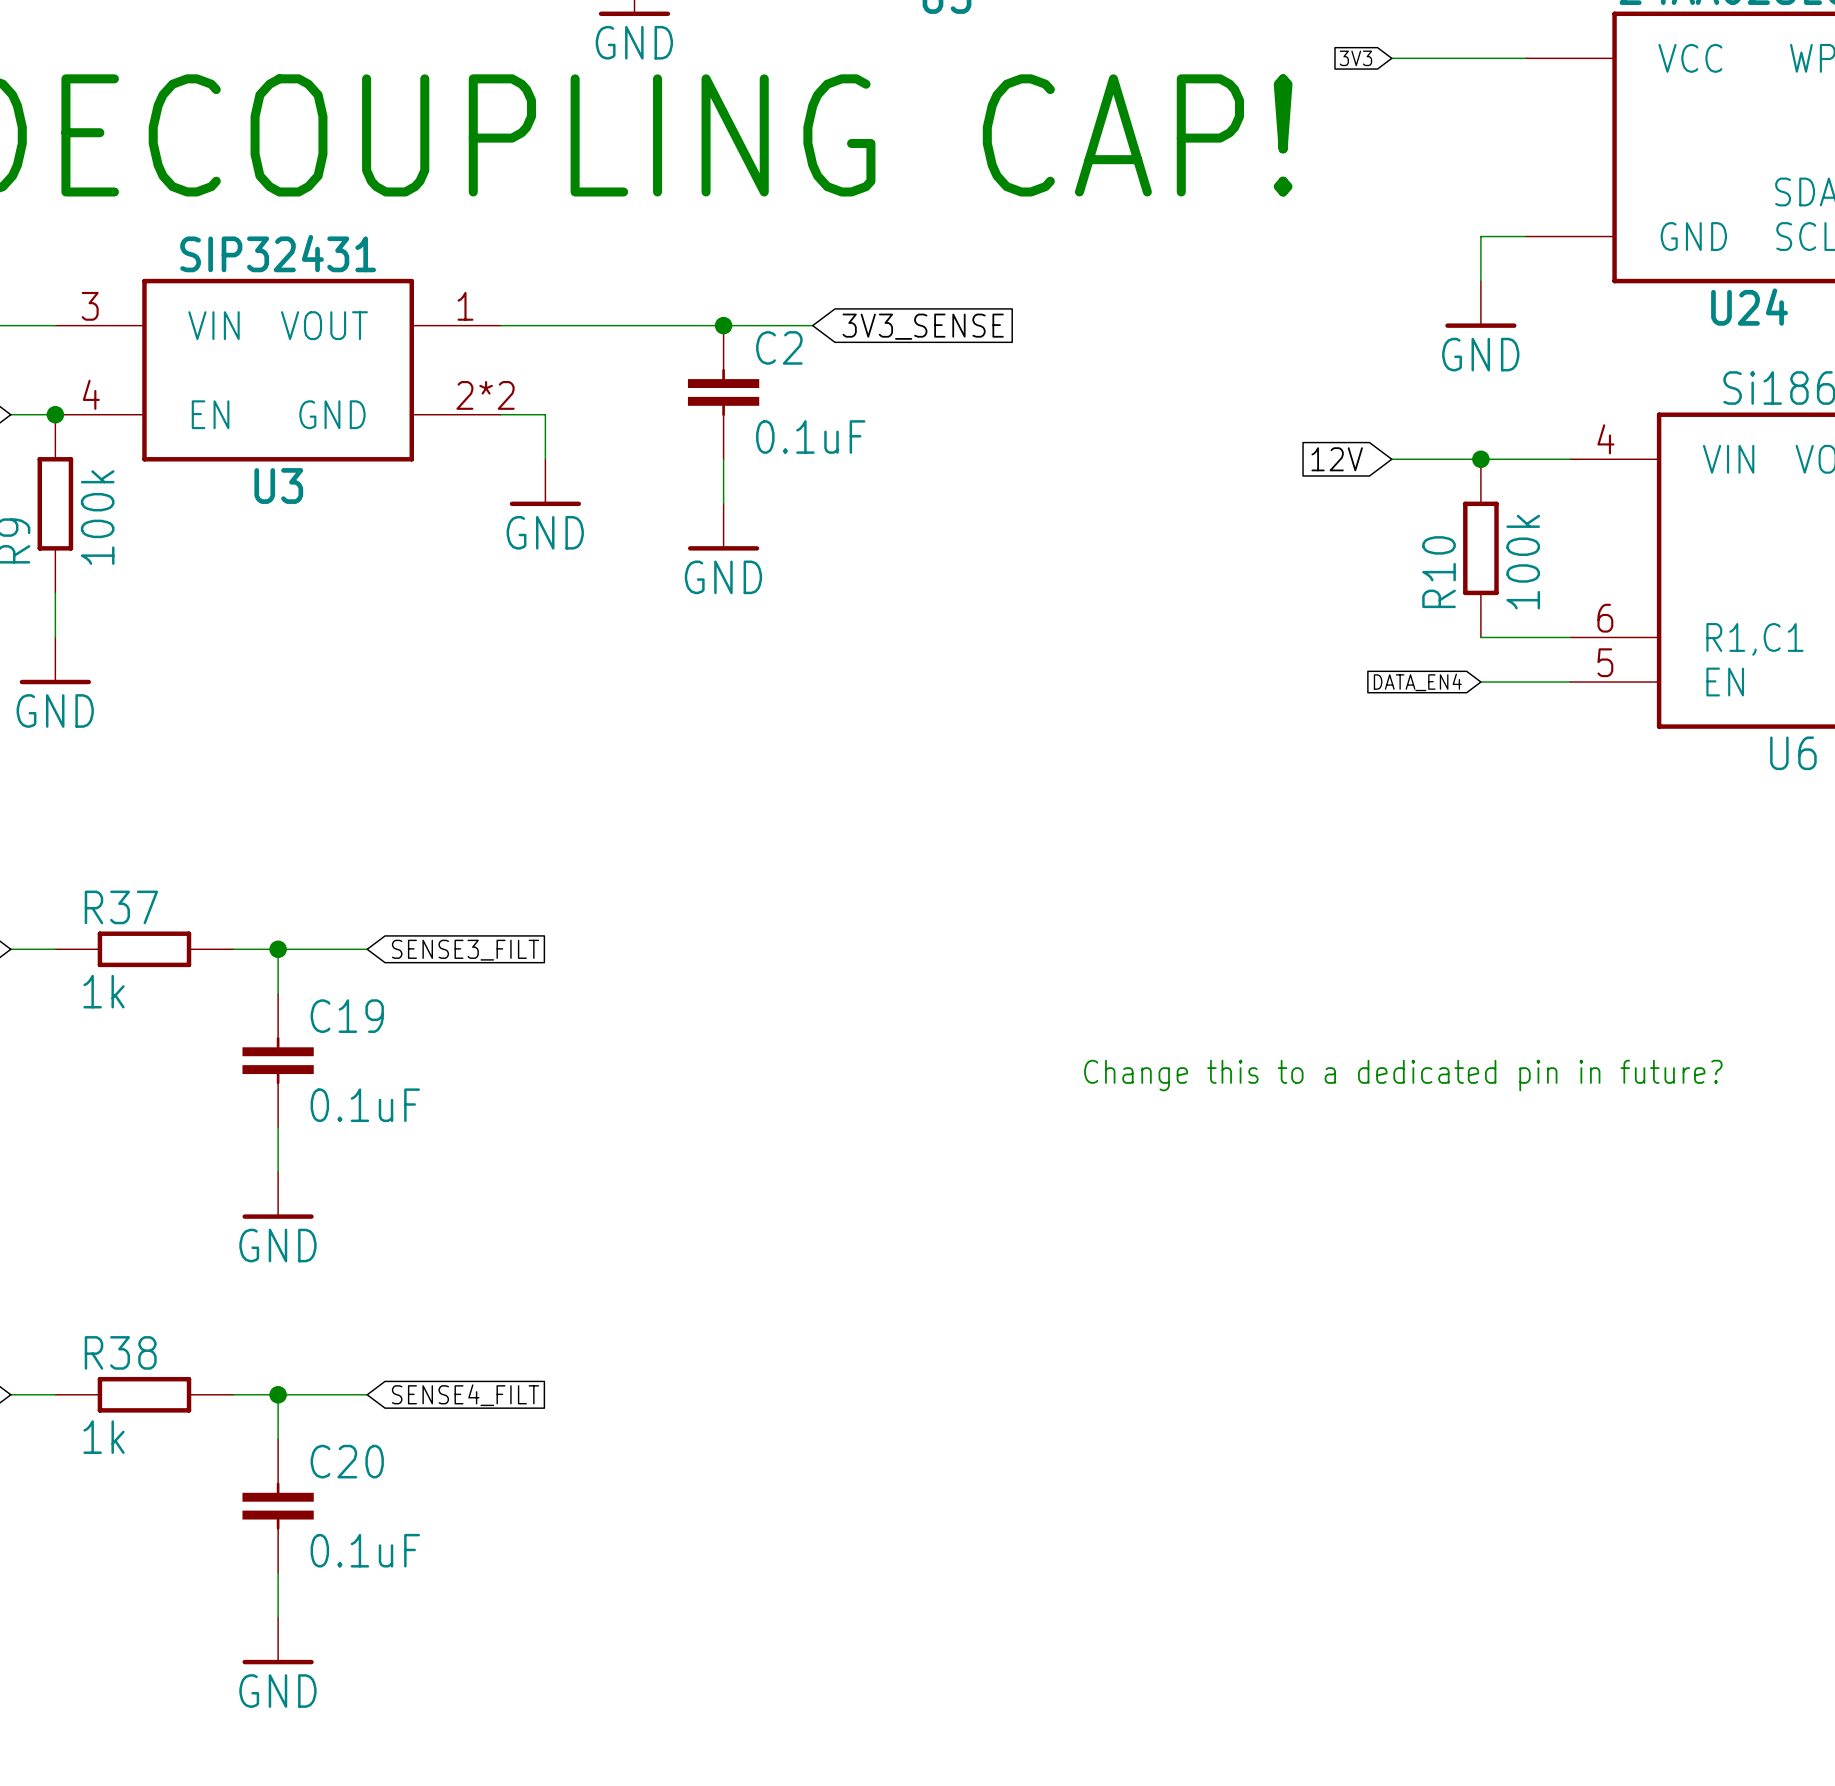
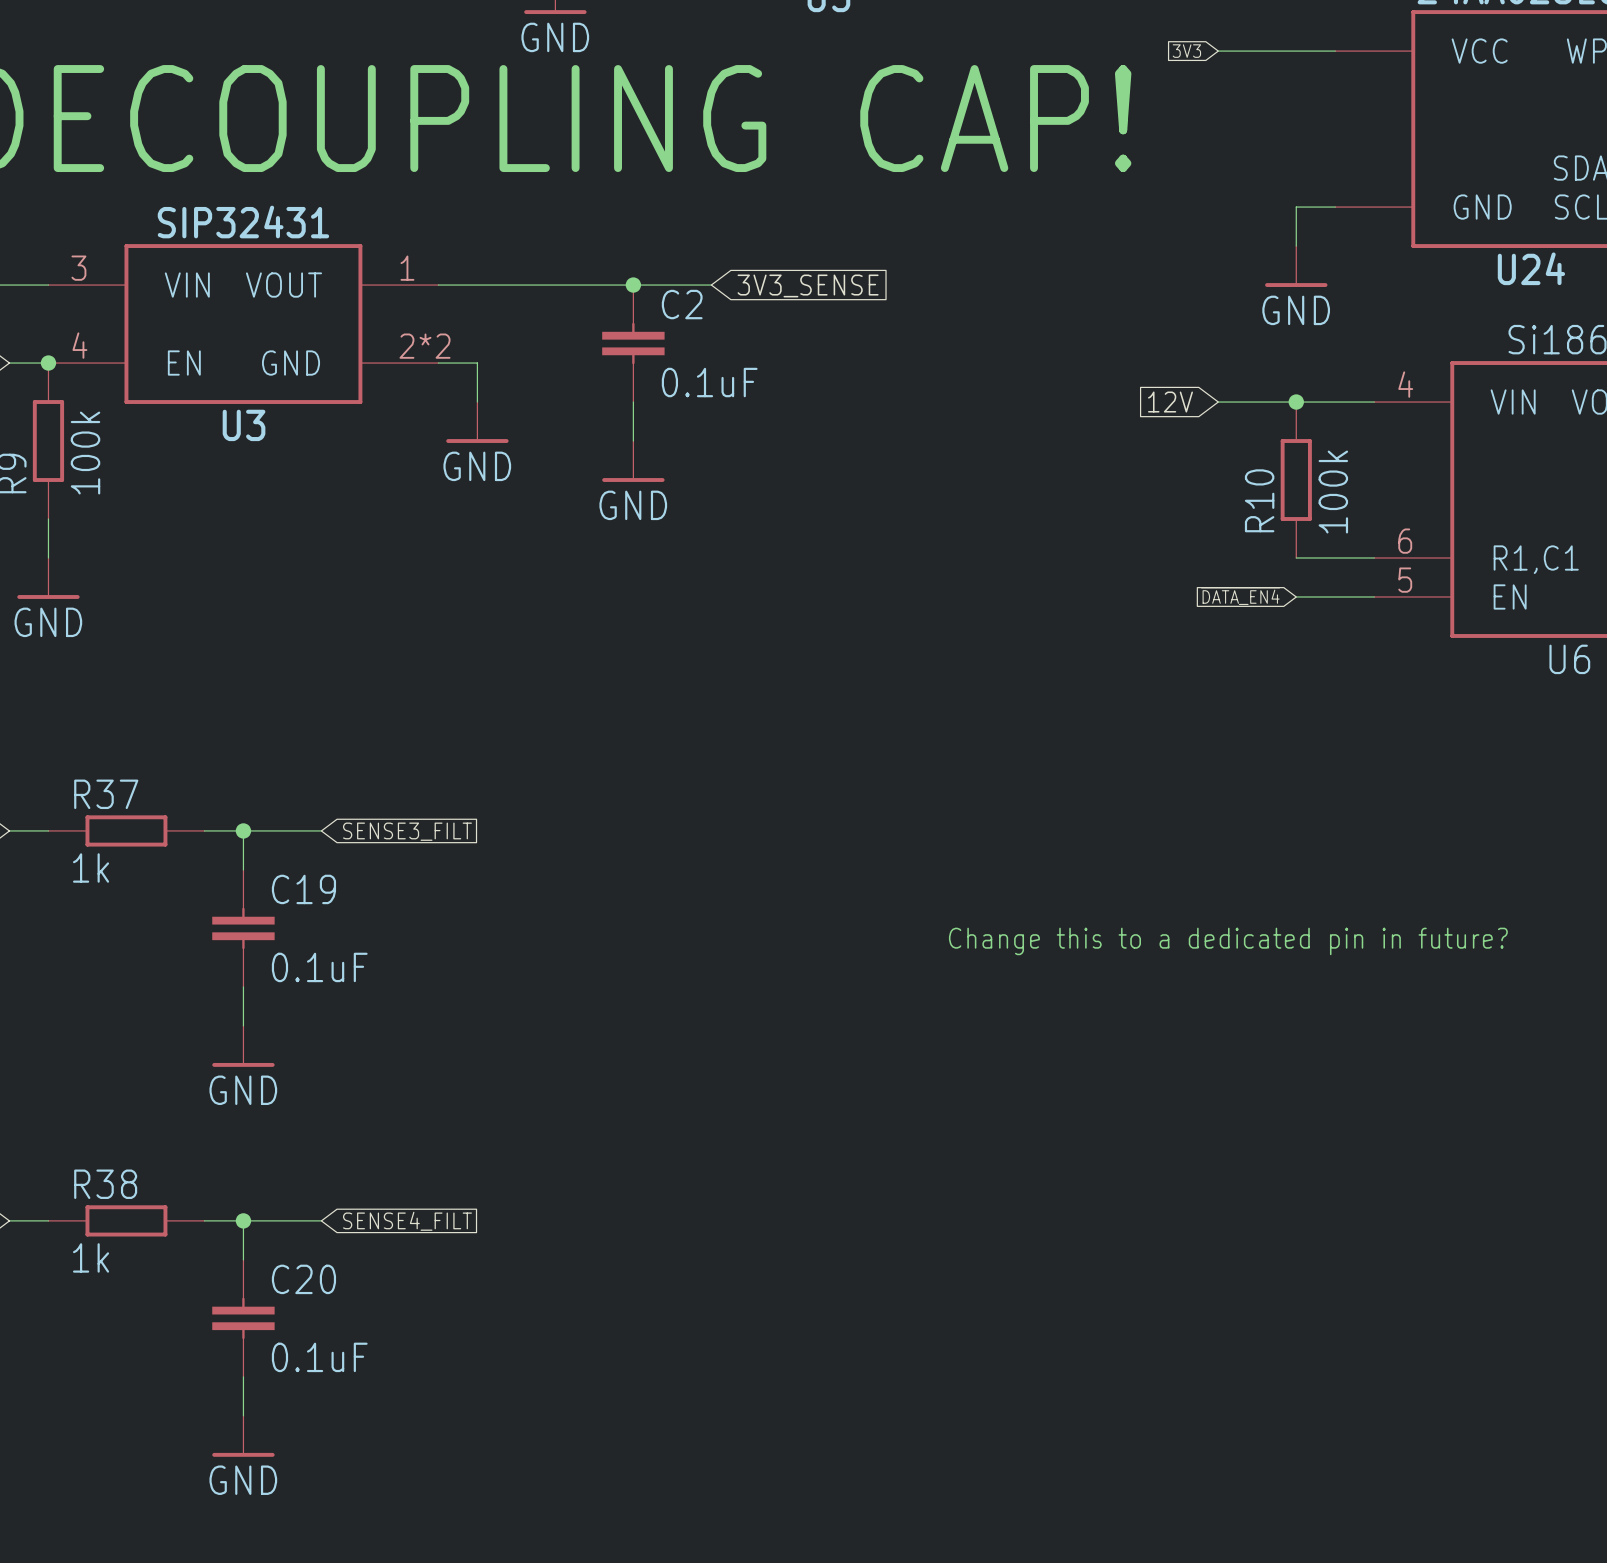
global label: DATA_EN4 (1417, 682) -> ~{DATA_EN4} (1240, 596)

